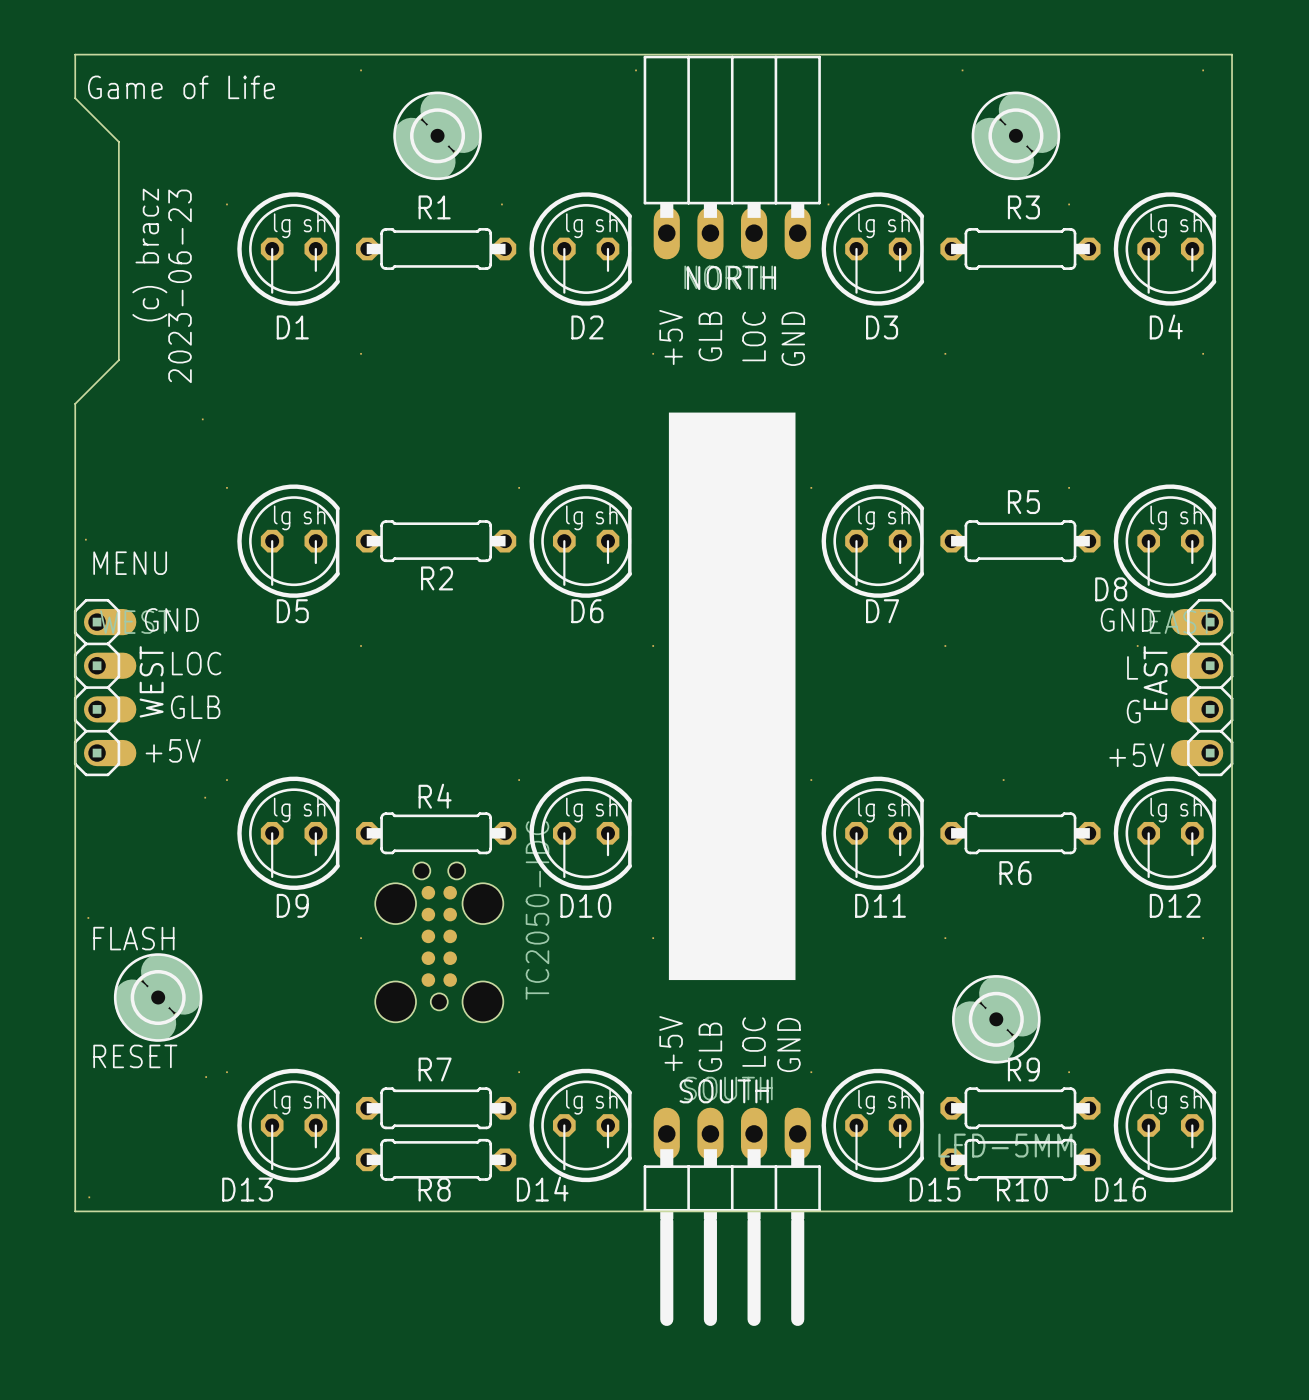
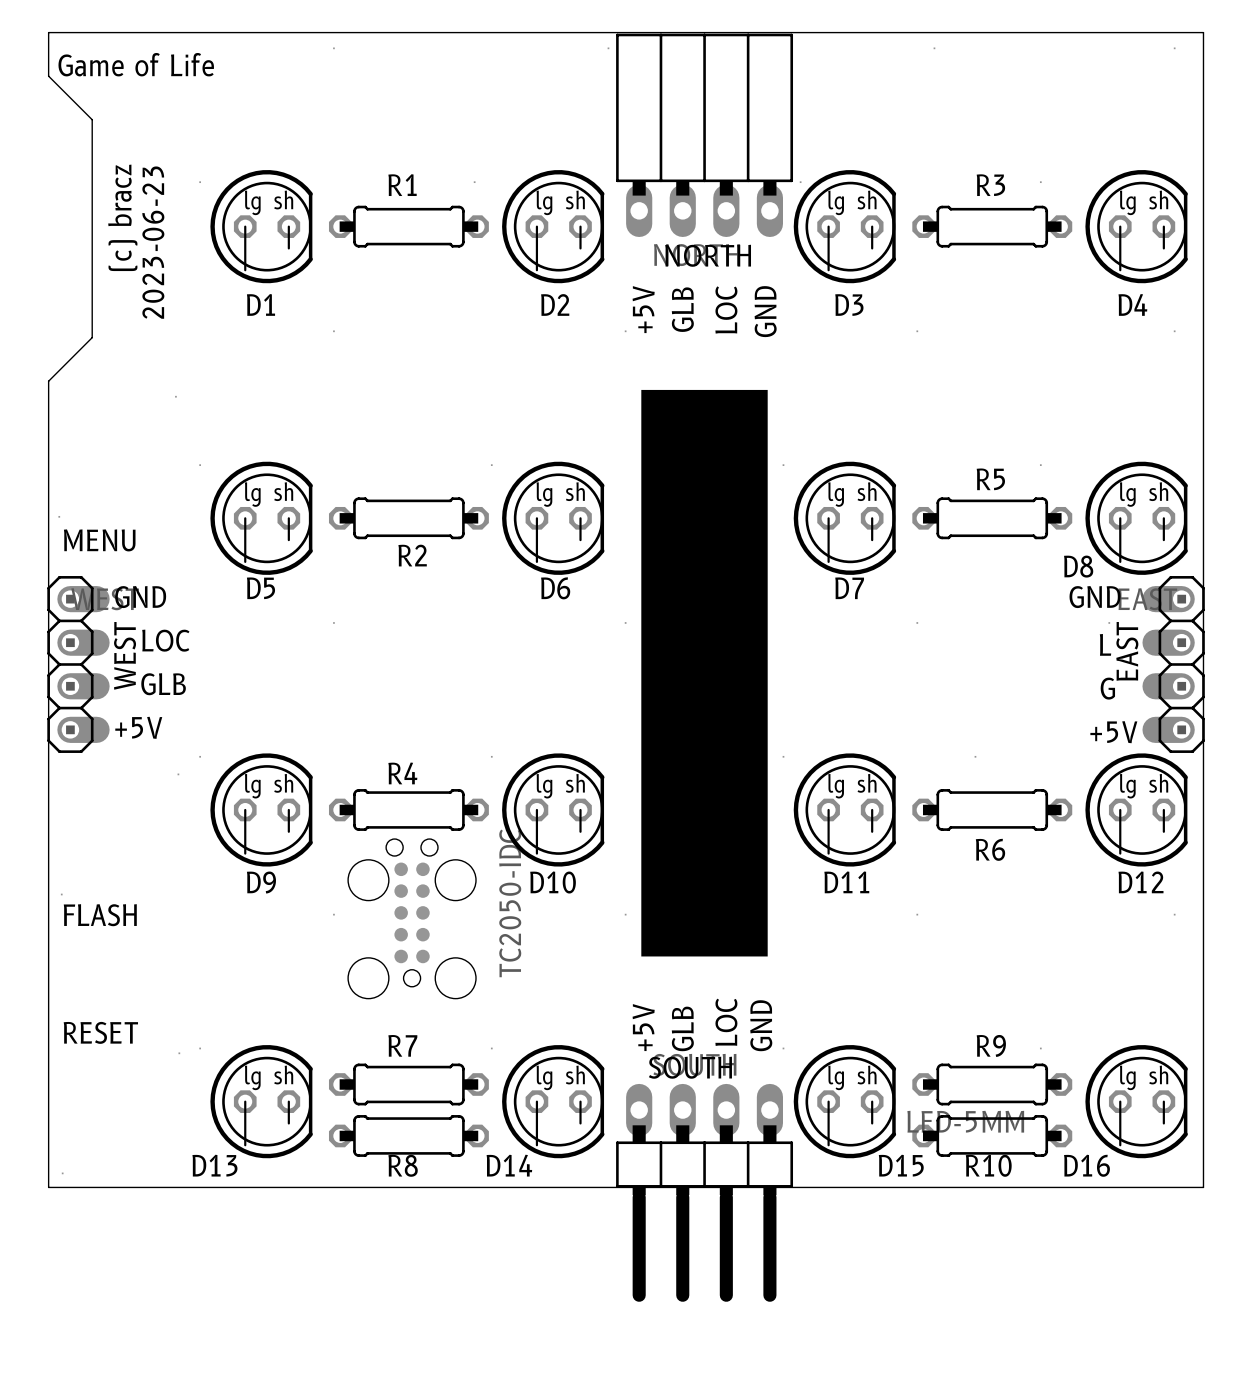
part: (437, 135) -> none
part: (1015, 135) -> none
part: (158, 997) -> none
part: (996, 1019) -> none

